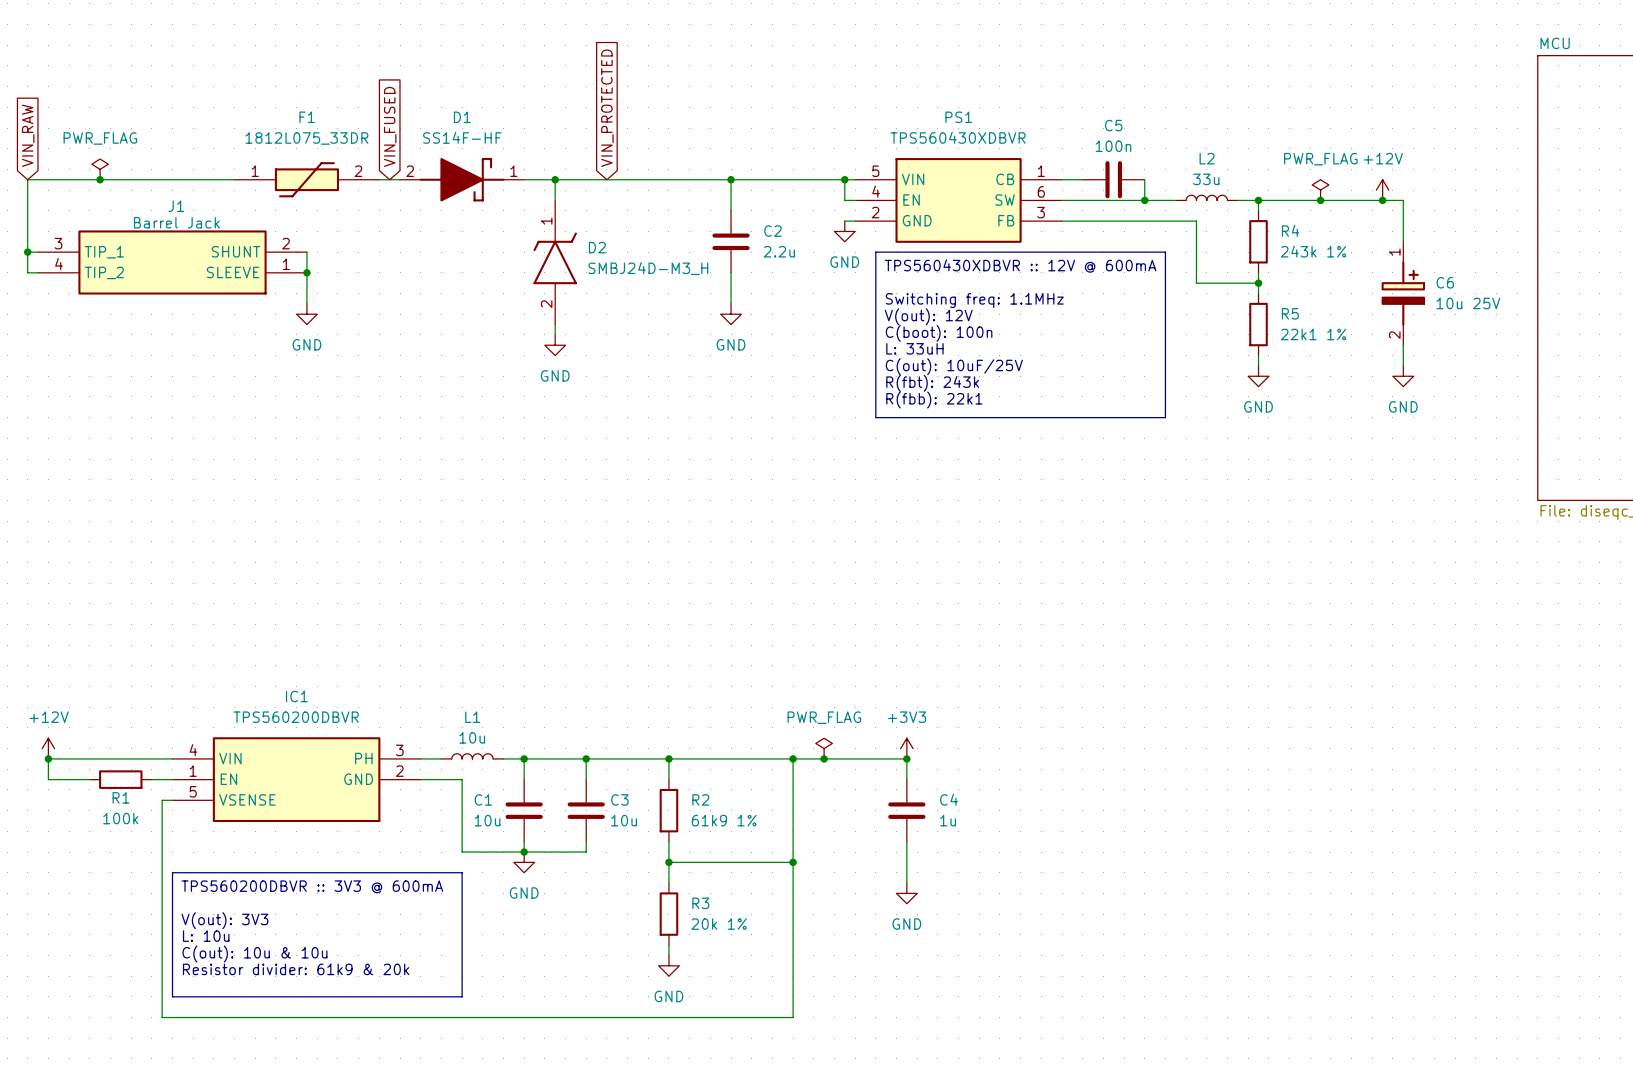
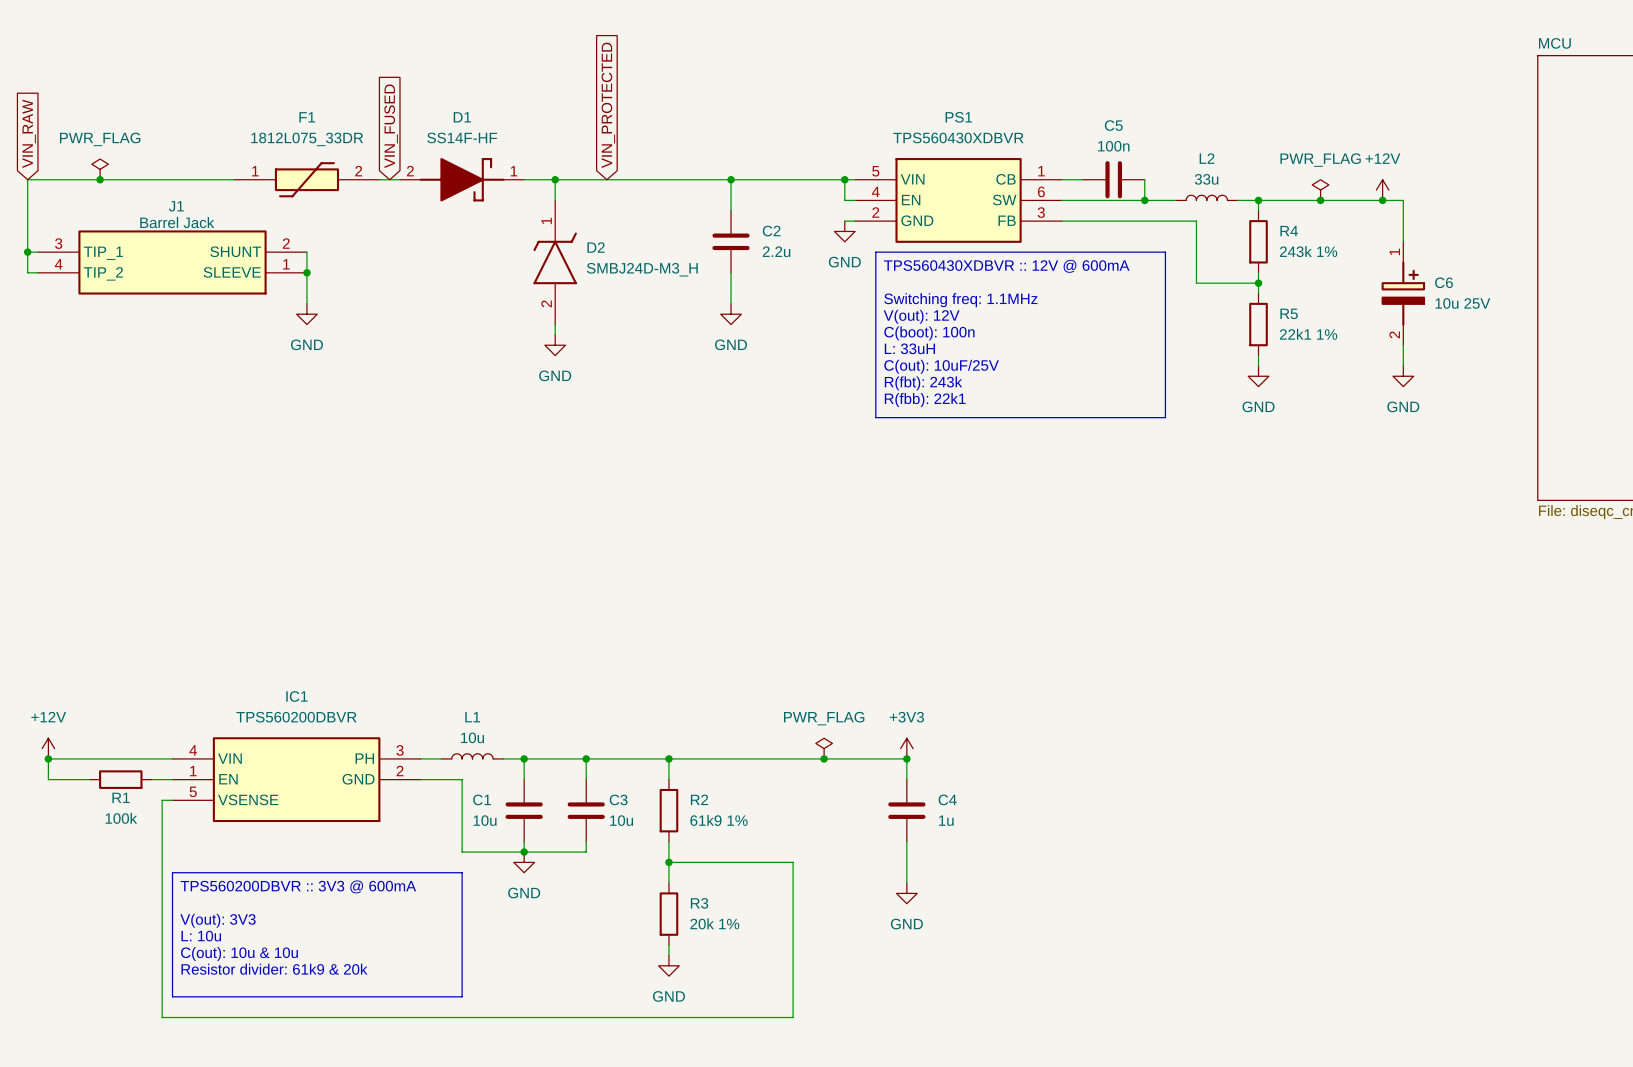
wire: (793, 758) (793, 862) -> none
junction: (793, 758) -> none
junction: (793, 862) -> none

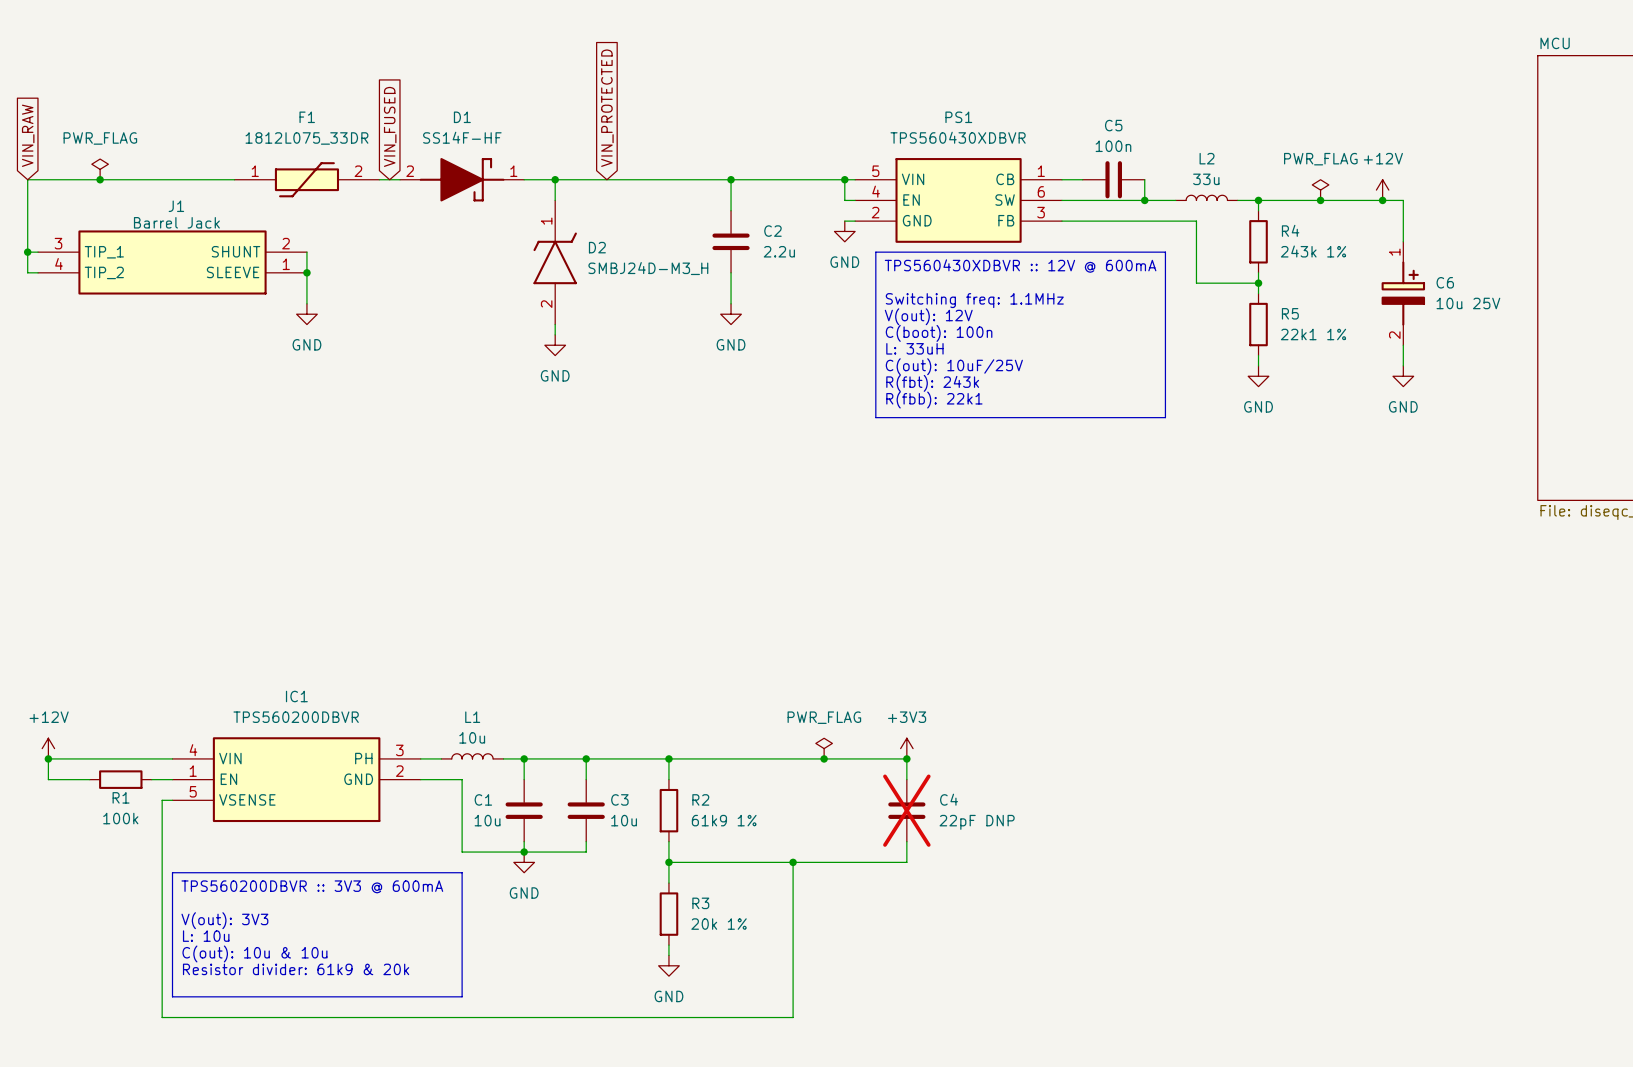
C4 do-not-place cross: none -> (906, 810)
C4 value: 1u (946, 820) -> 22pF DNP (977, 822)
junction: none -> (793, 862)
wire: (906, 862) (906, 883) -> (906, 862) (793, 862)
power symbol: GND (906, 893) -> none

